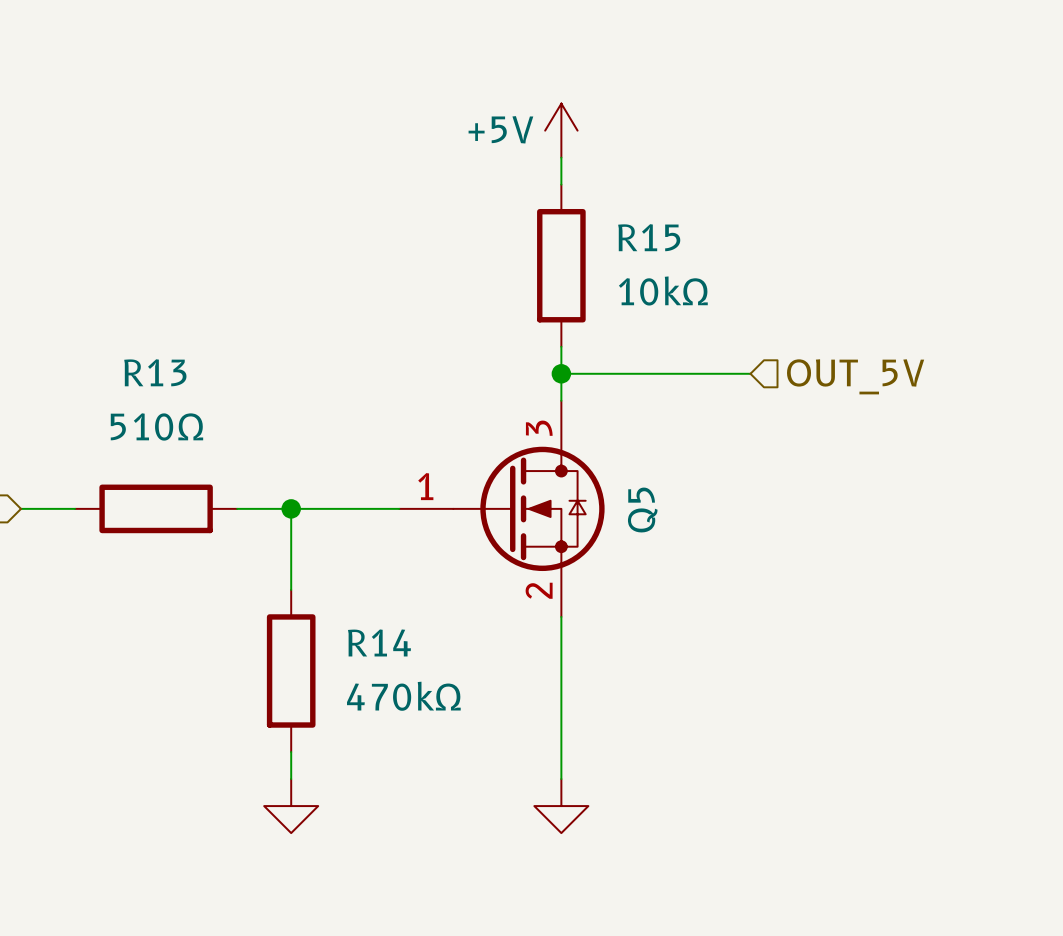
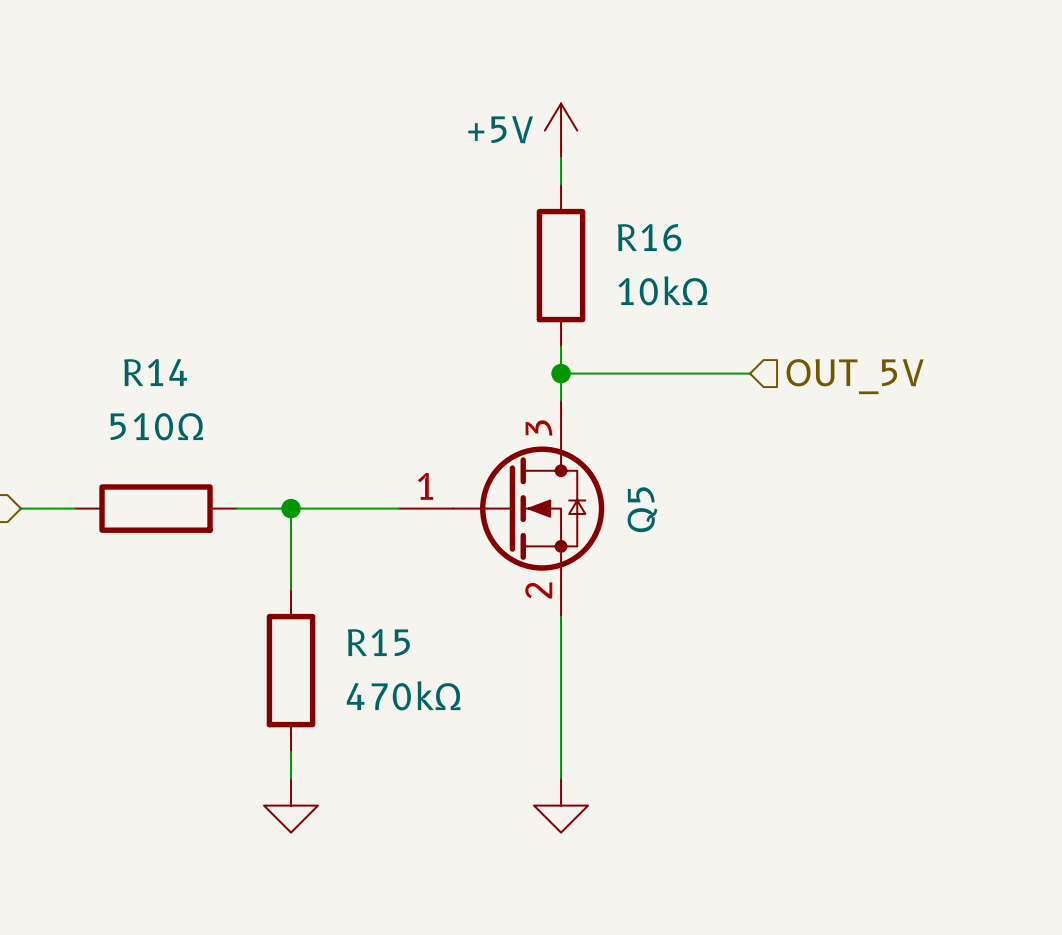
R15 name: R15 (649, 237) -> R16 (649, 237)
R13 name: R13 (155, 372) -> R14 (155, 372)
R14 name: R14 (379, 642) -> R15 (378, 642)

